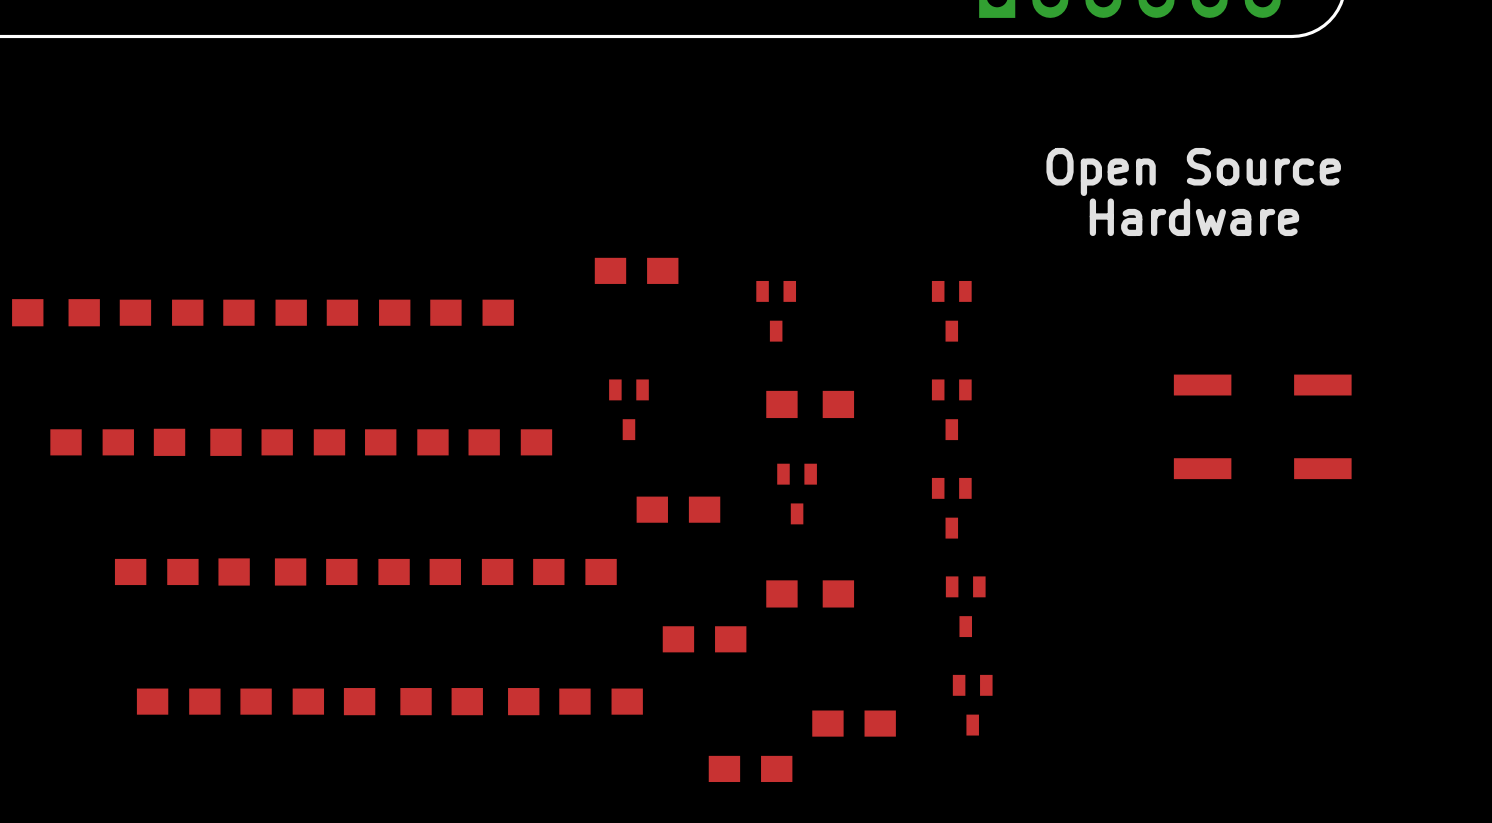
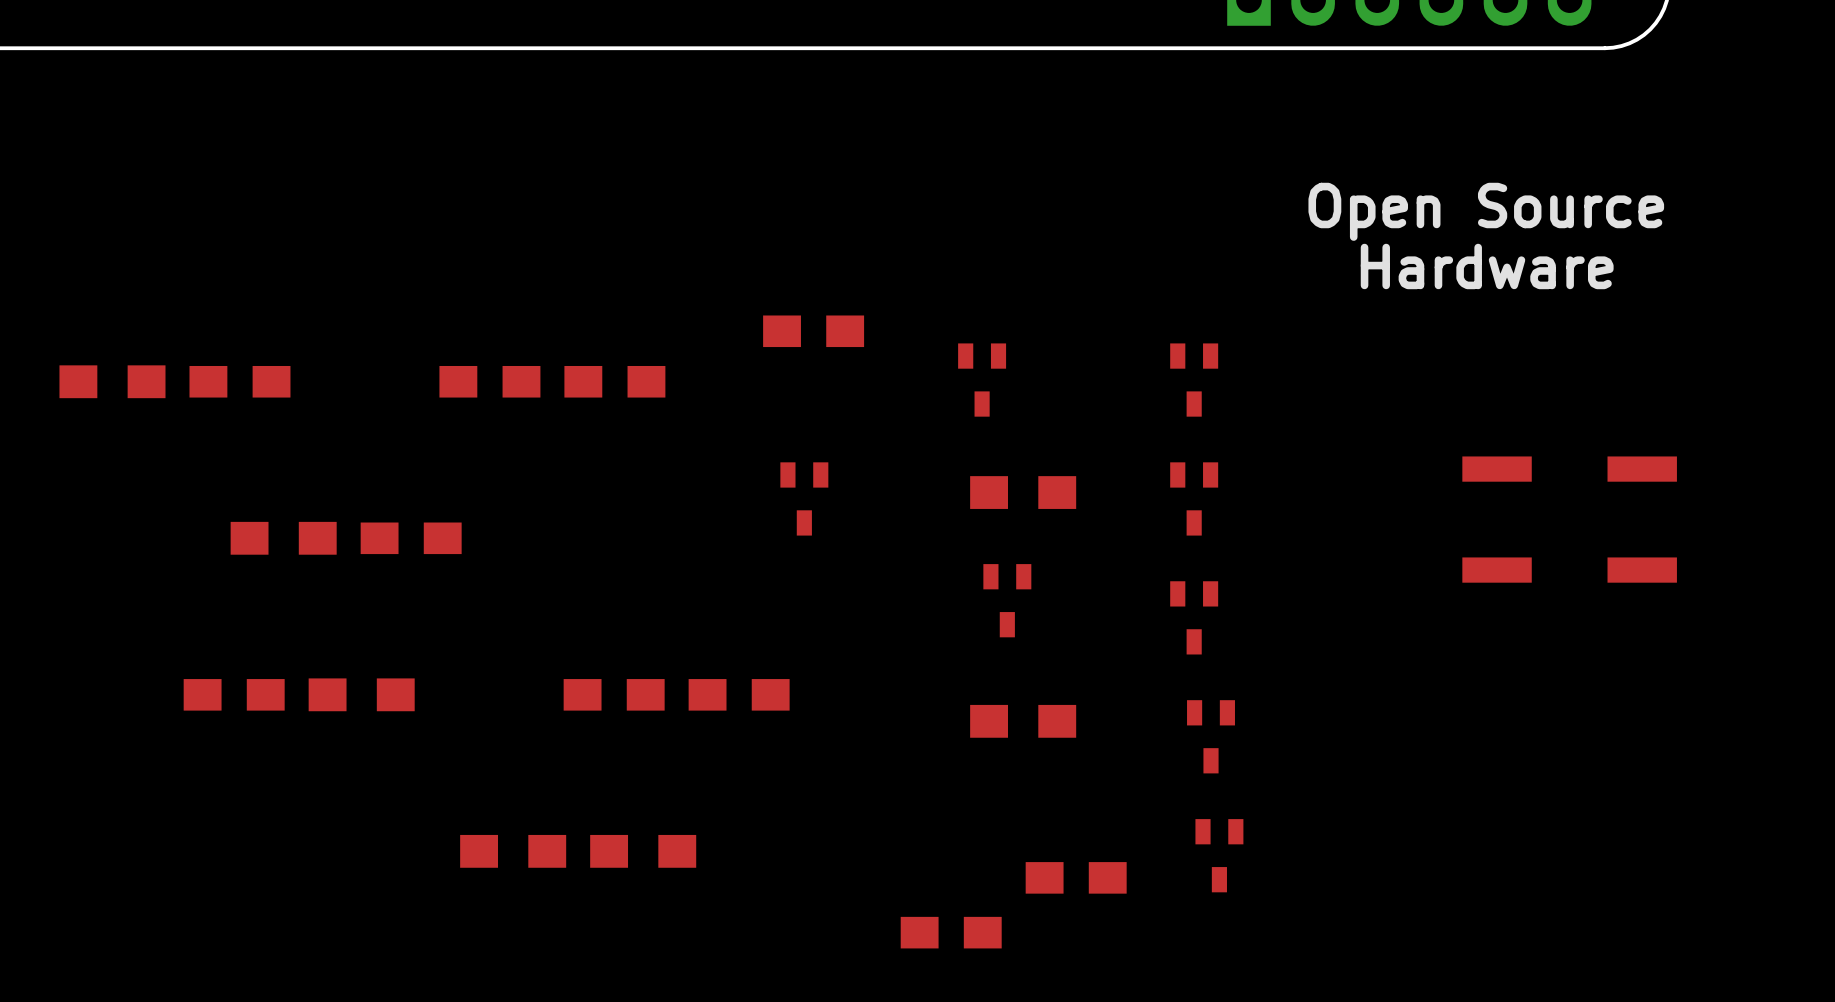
part: (265, 312) -> none
part: (92, 442) -> none
part: (406, 442) -> none
part: (510, 442) -> none
part: (678, 509) -> none
part: (367, 571) -> none
part: (704, 639) -> none
part: (178, 701) -> none
part: (282, 701) -> none
part: (601, 701) -> none

